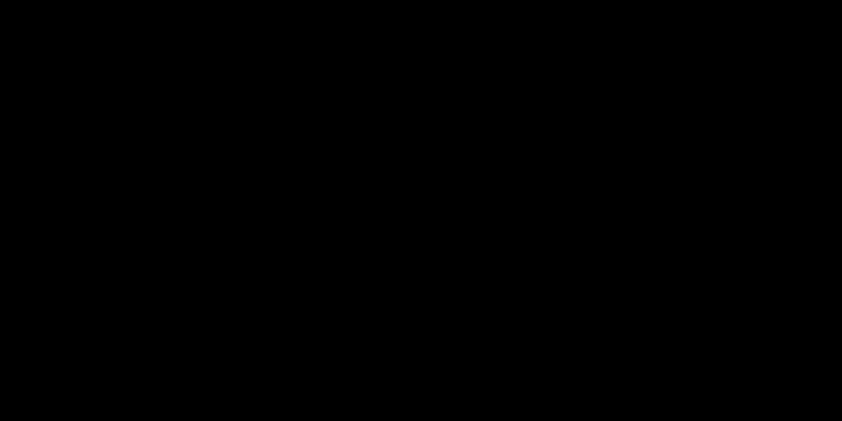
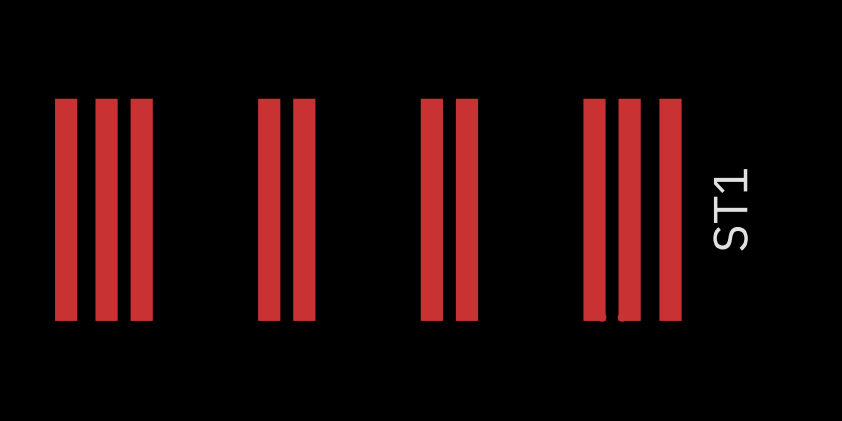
ST1: none -> (368, 209)

